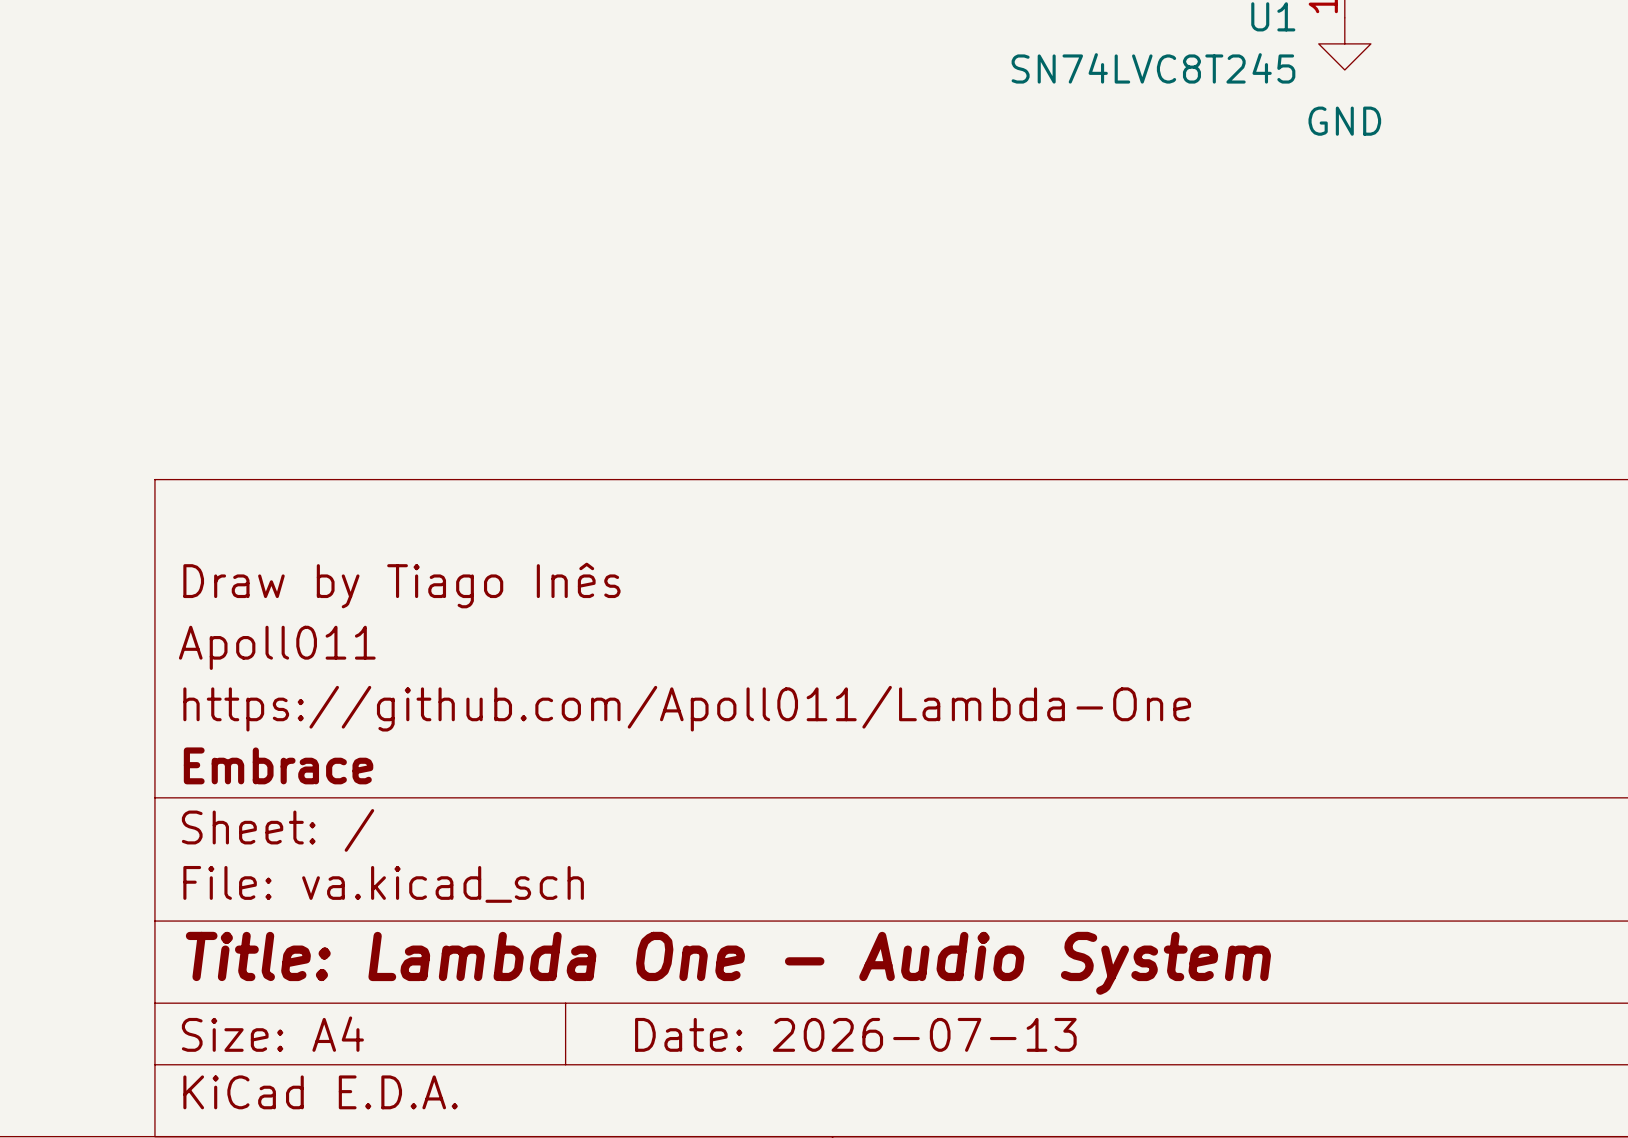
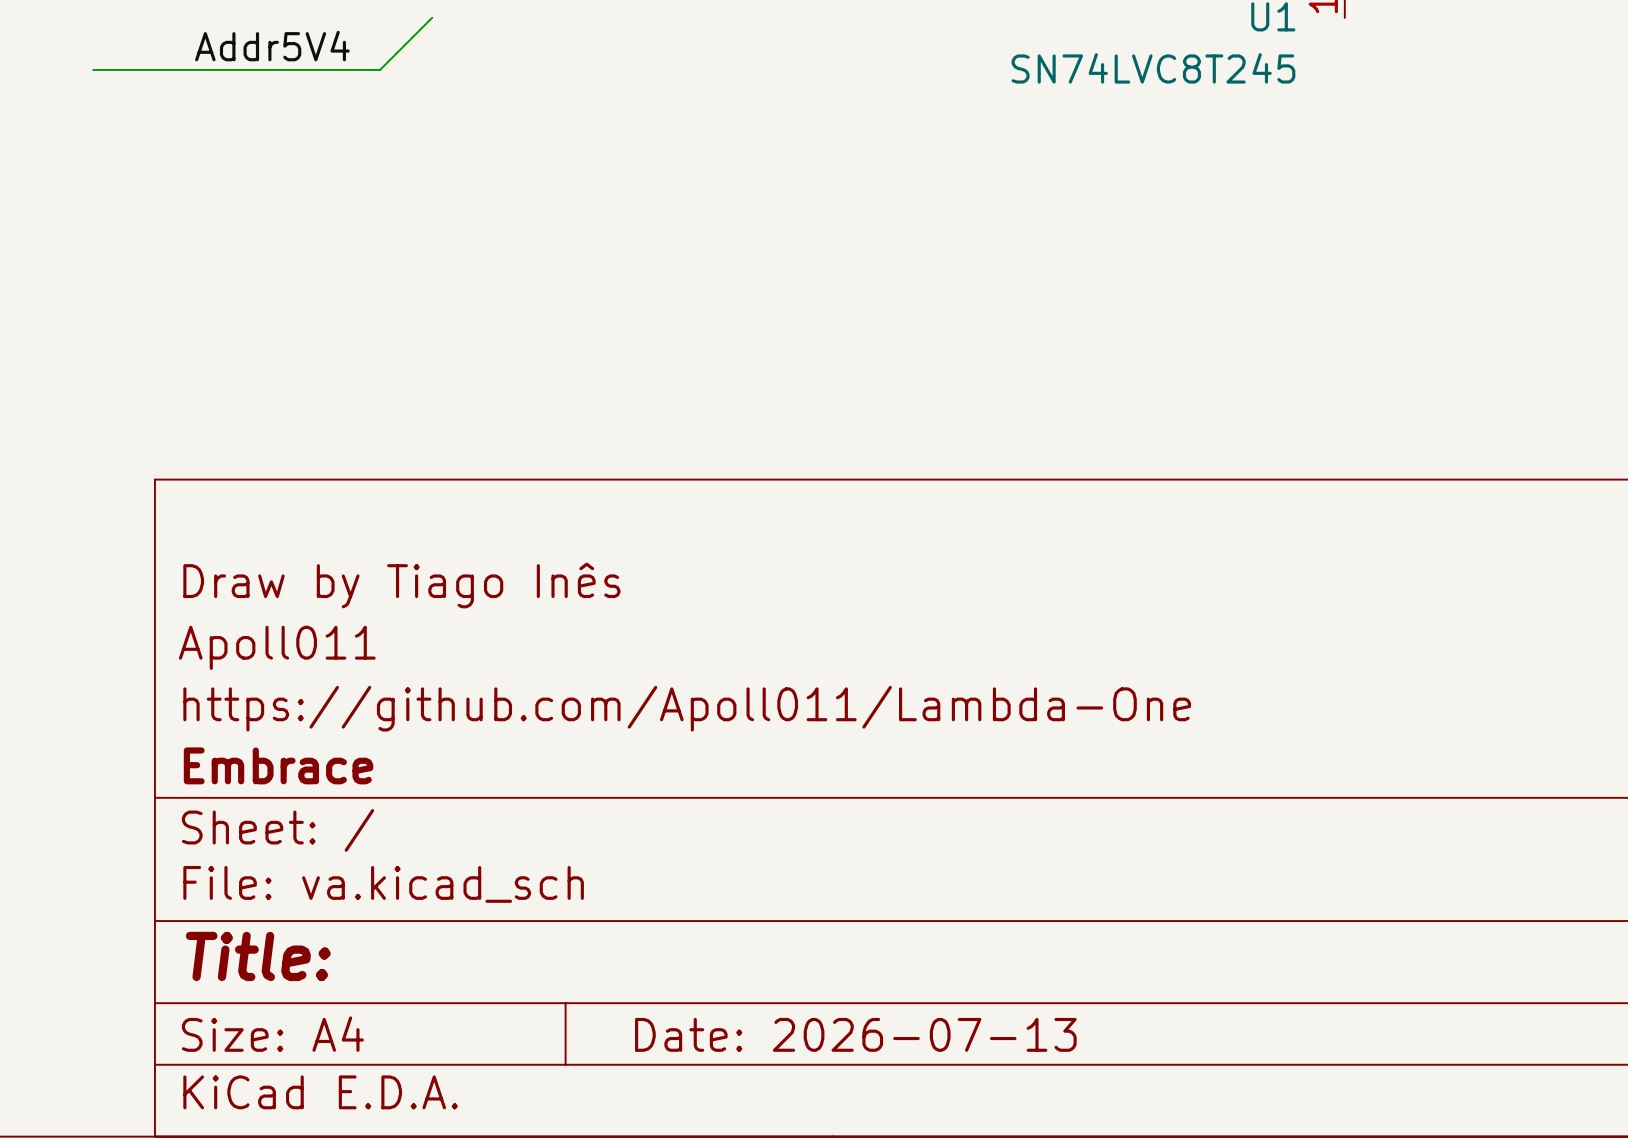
wire: none -> (432, 17) (380, 69) (93, 69)
power symbol: GND (1344, 43) -> none
label: none -> Addr5V4 (272, 46)
title block: Title: Lambda One - Audio System (728, 963) -> Title: (258, 956)

